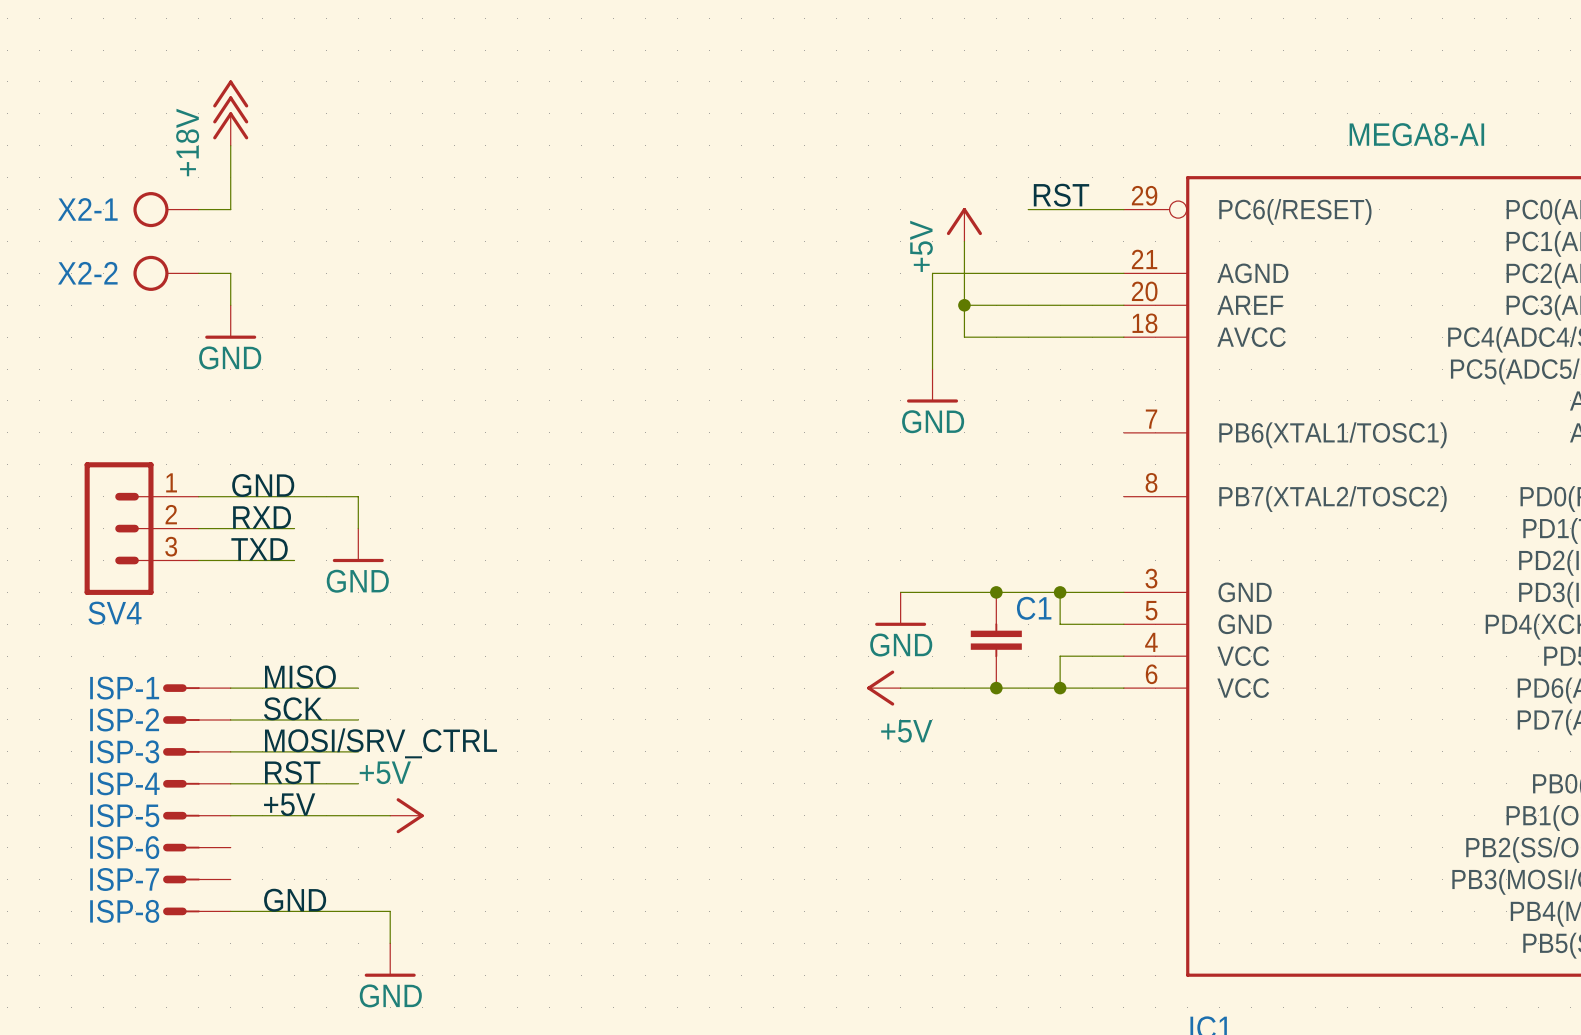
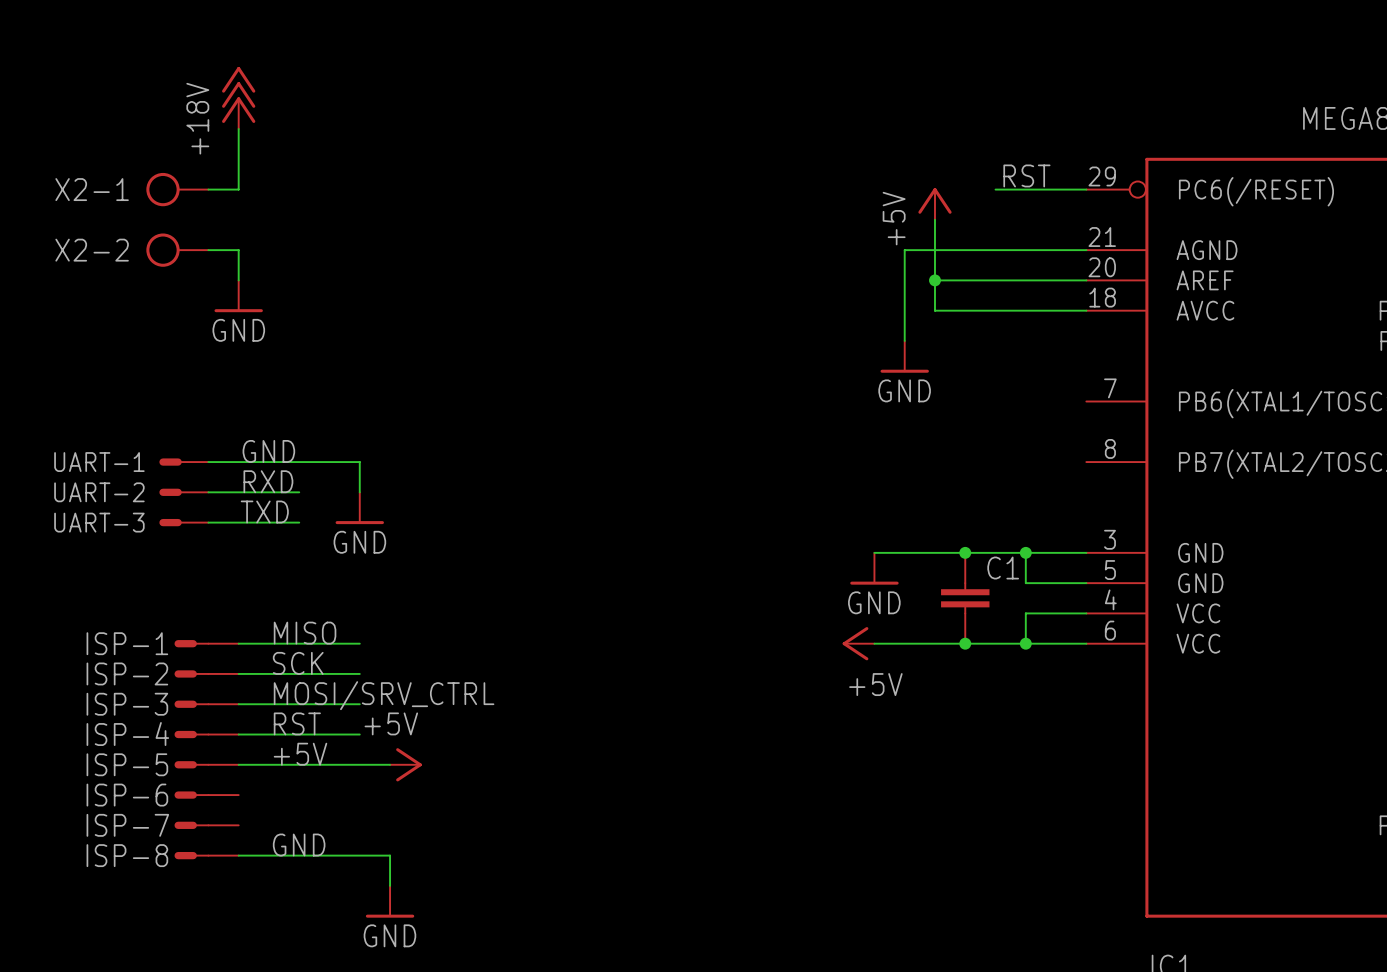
UART-1: none -> (183, 462)
SV4: (141, 528) -> none
UART-2: none -> (183, 492)
UART-3: none -> (183, 522)

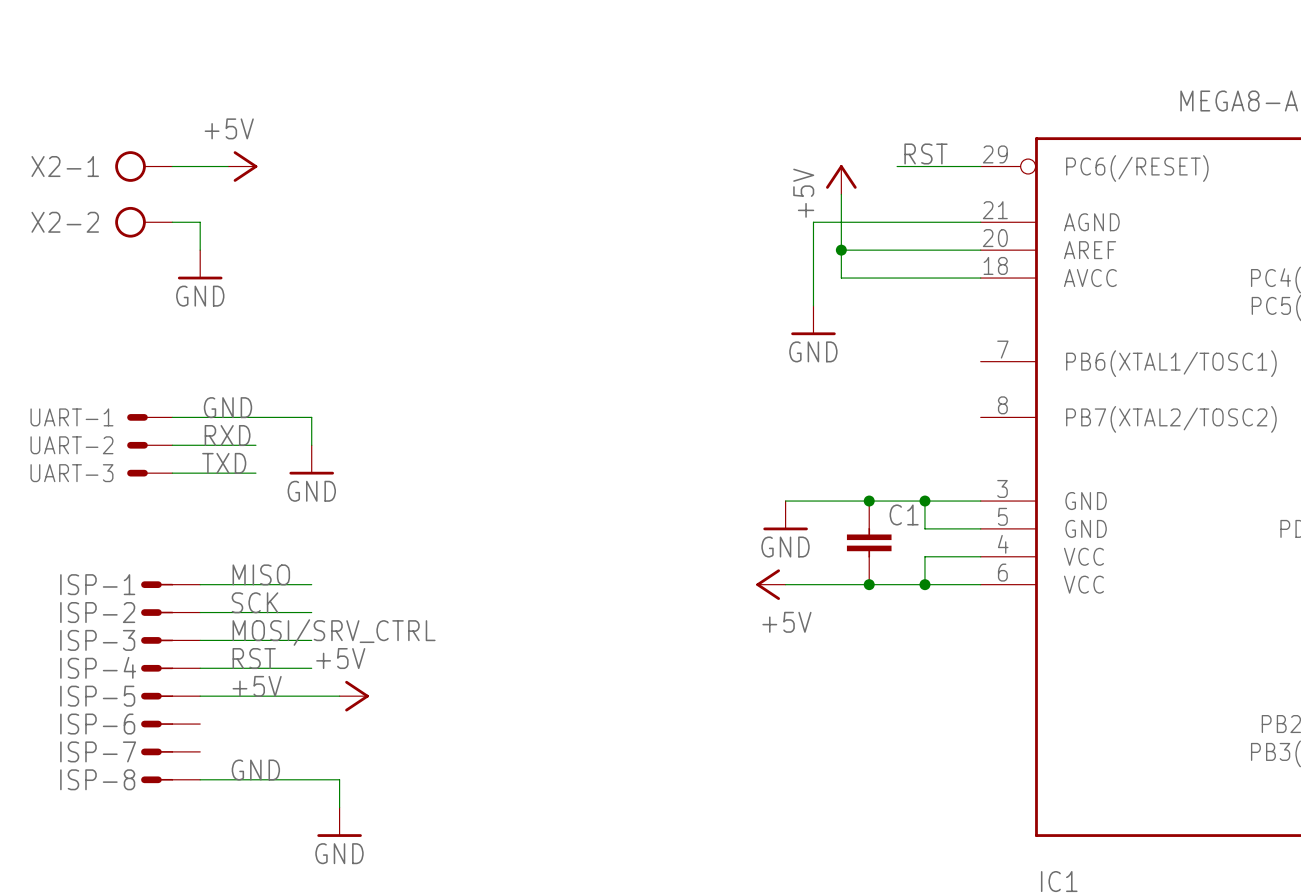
power symbol: +18V (238, 98) -> none
wire: (238, 129) (238, 189) -> (228, 166) (200, 166)
power symbol: none -> +5V (242, 166)

